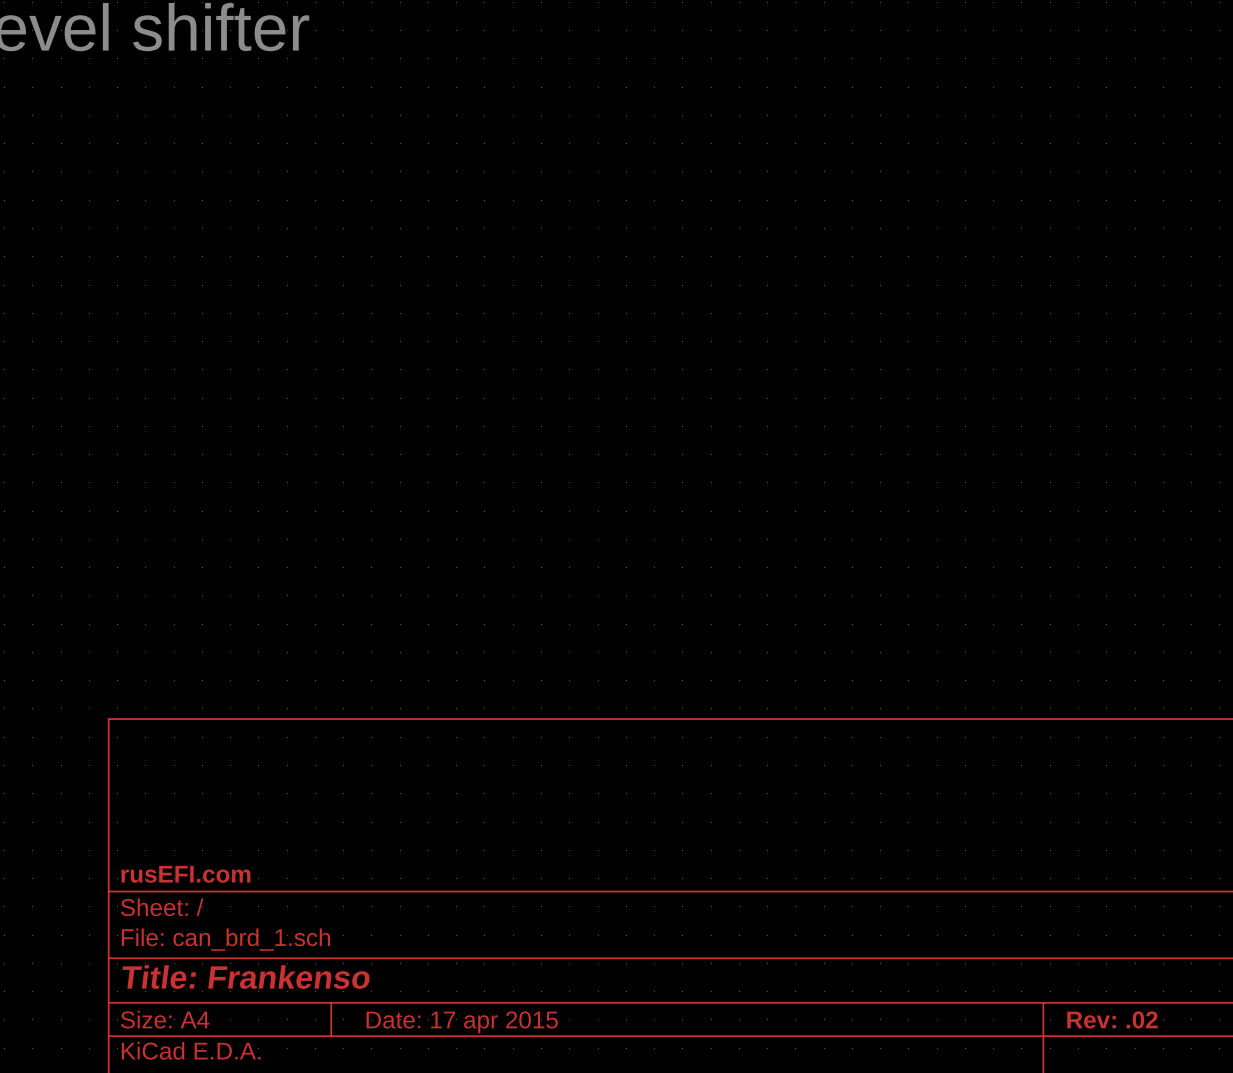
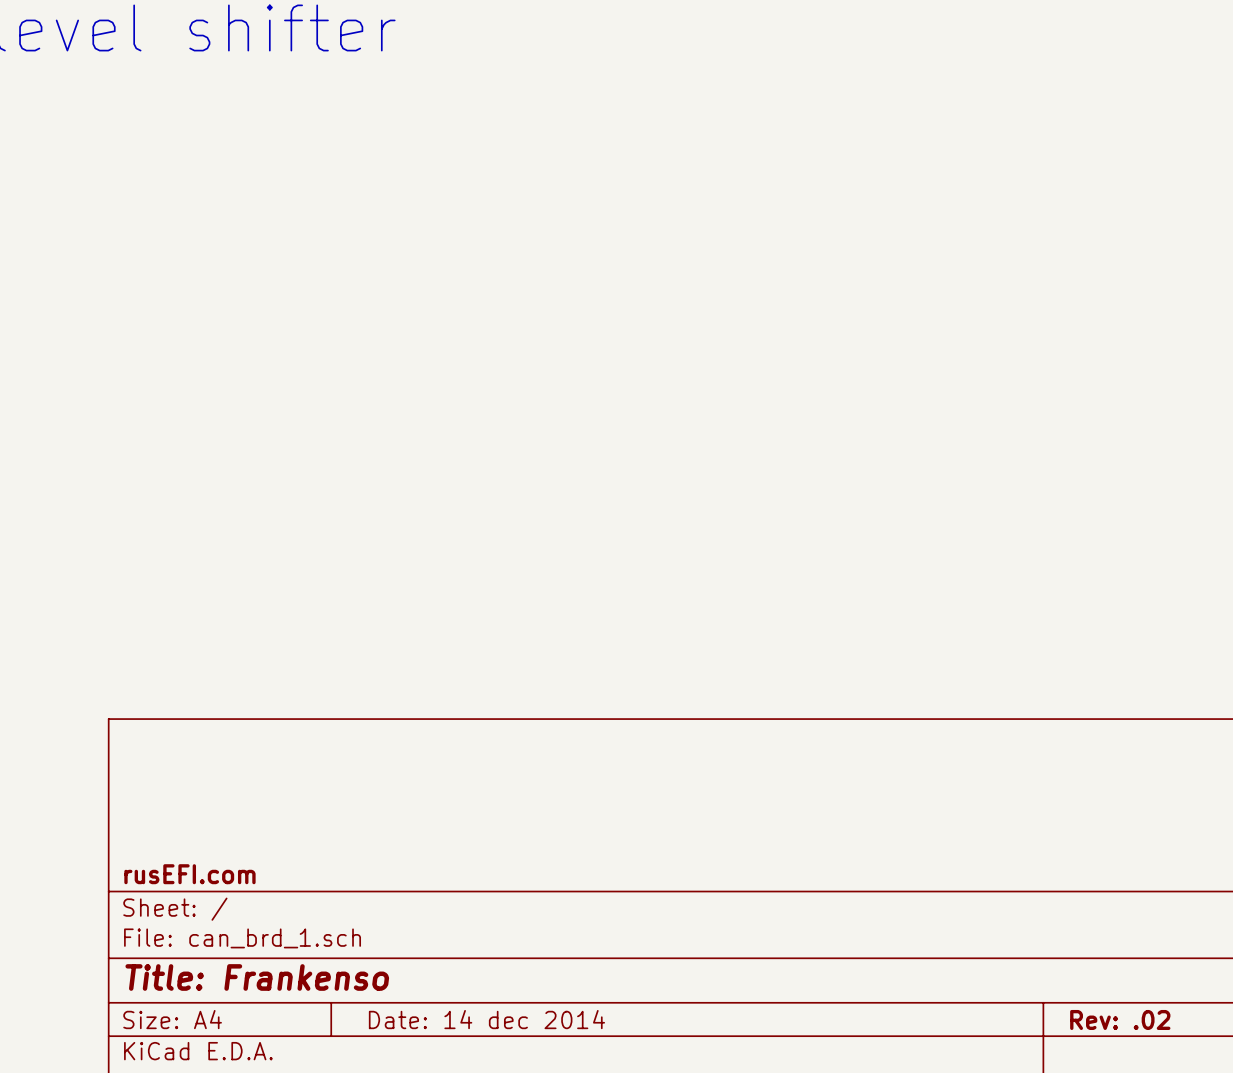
title block: Date: 17 apr 2015 (462, 1022) -> Date: 14 dec 2014 (486, 1019)

